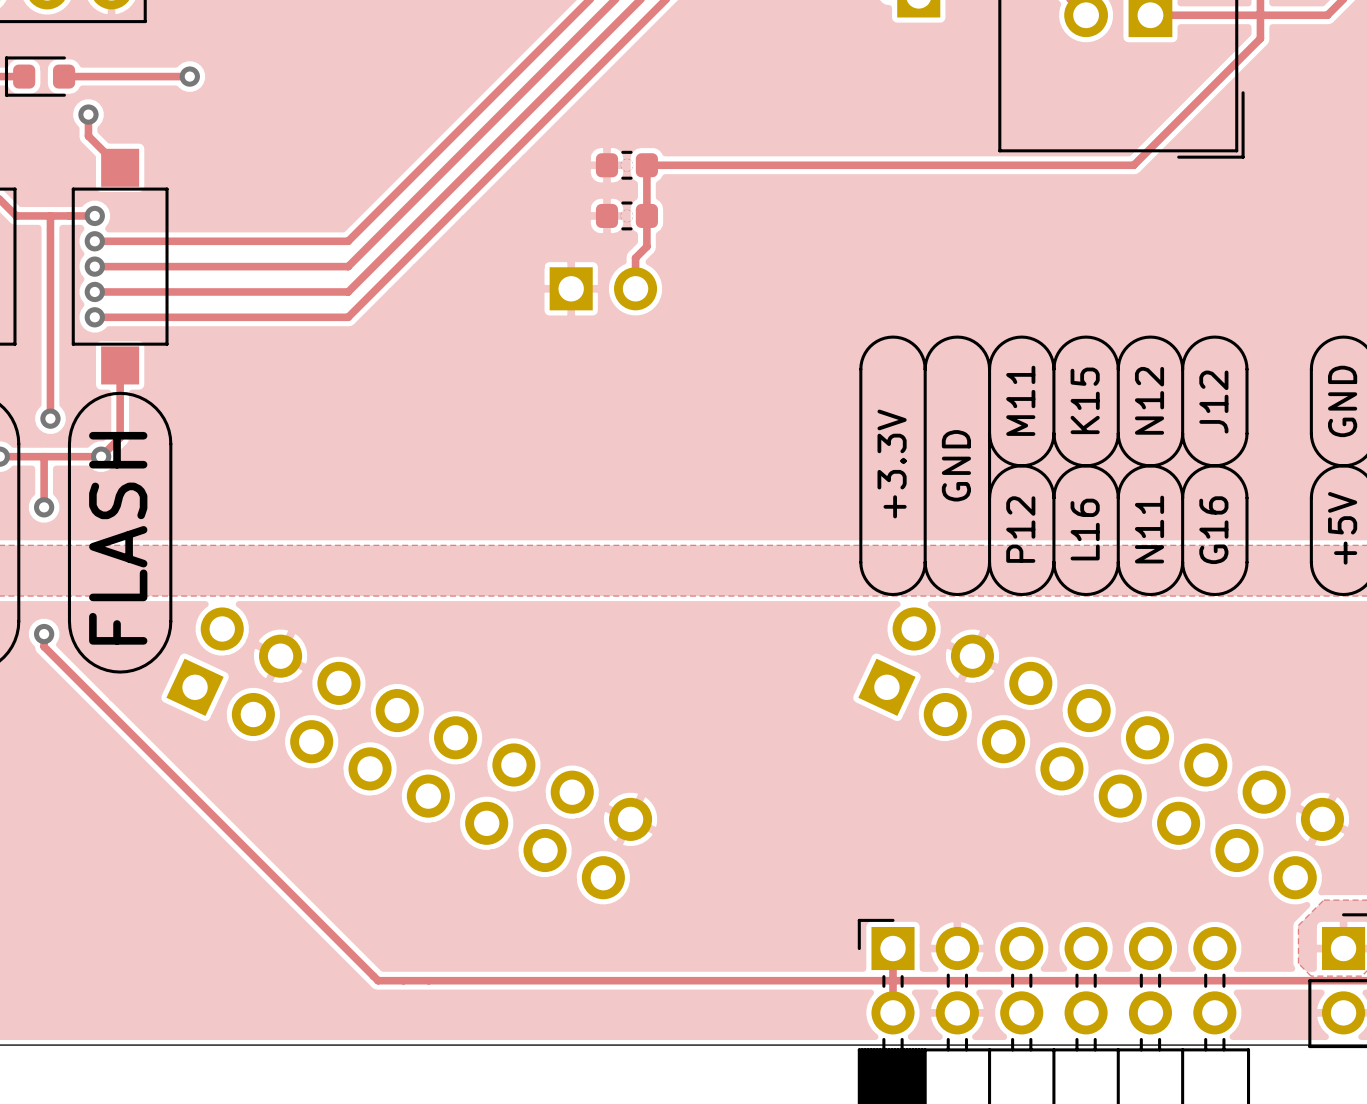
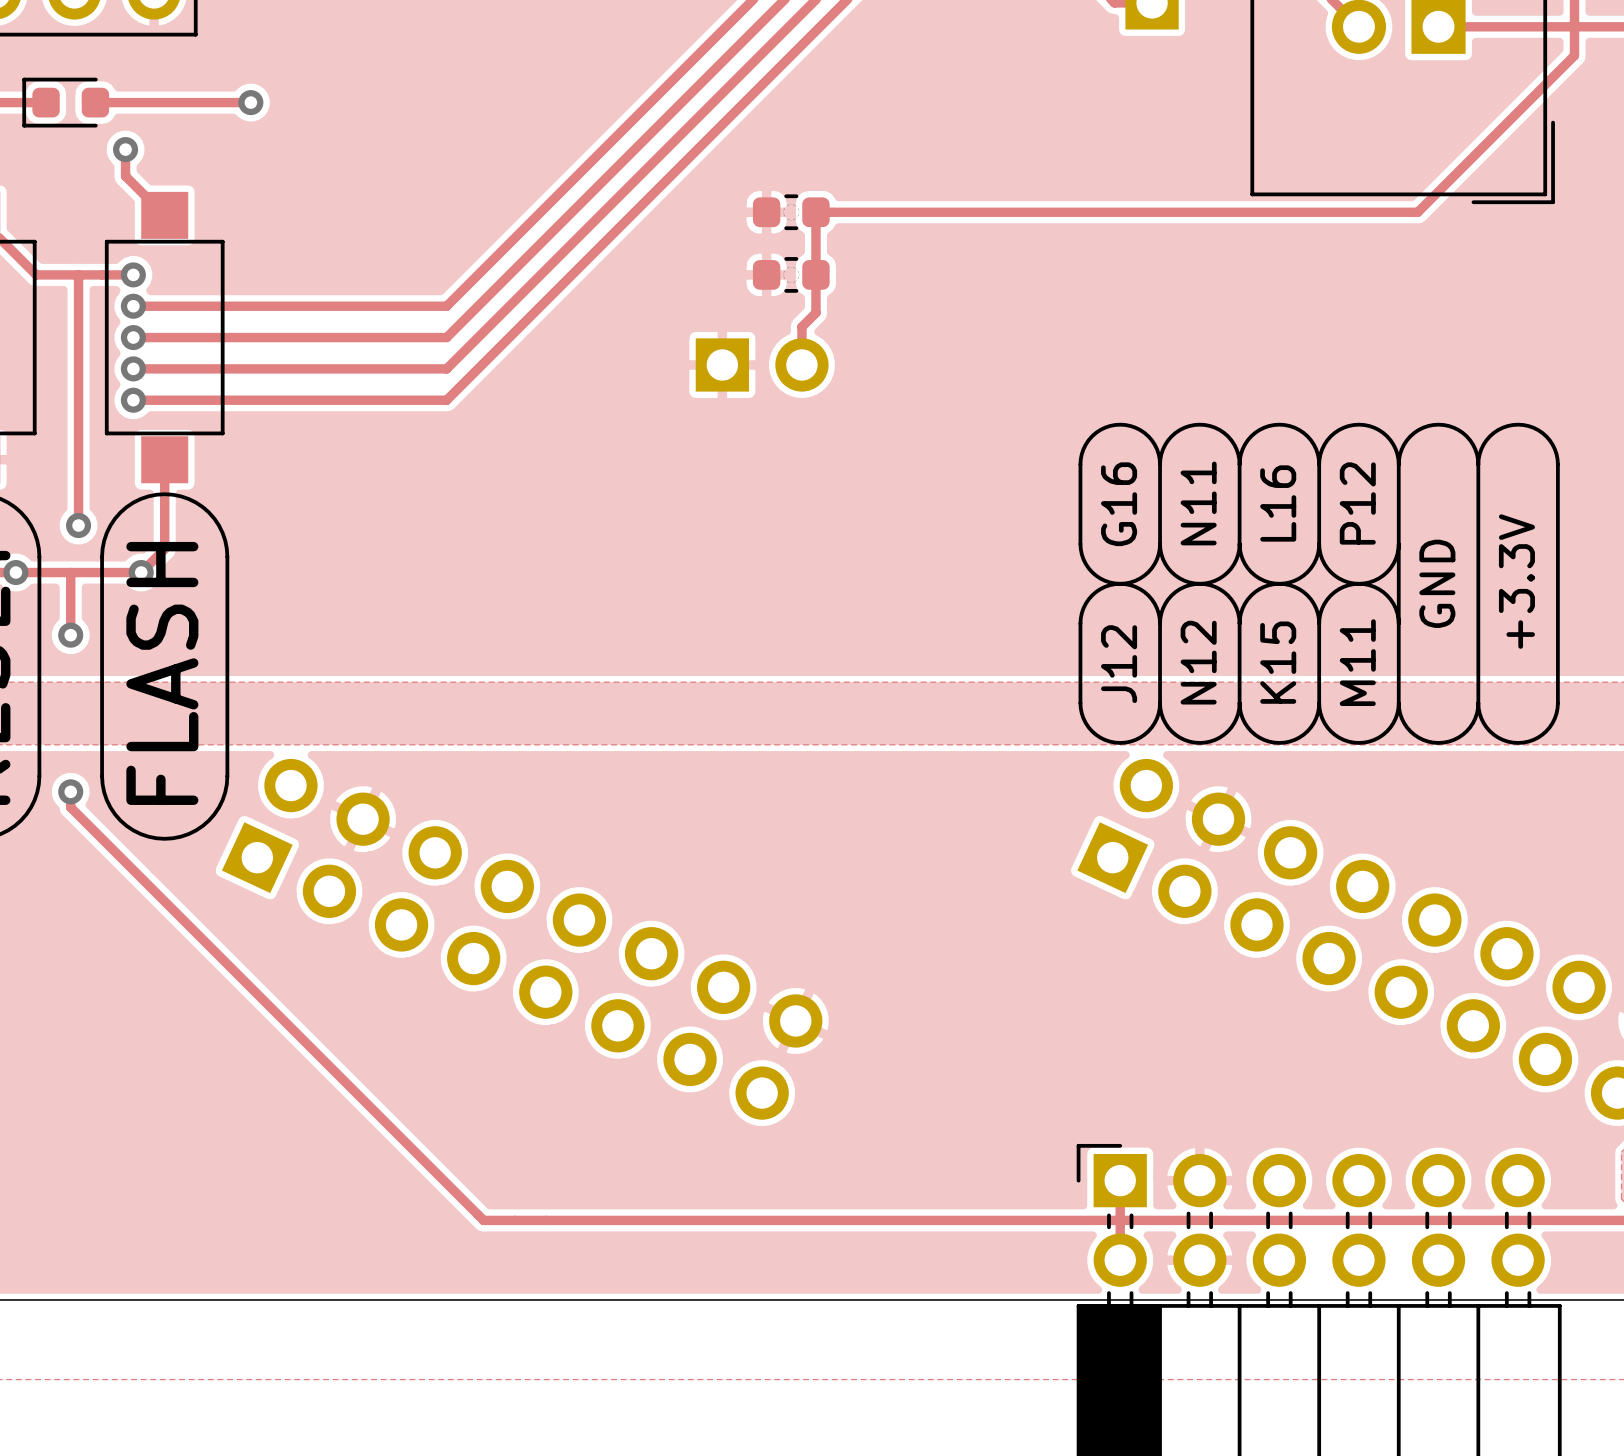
text: M11 (1020, 400) -> L16 (1278, 503)
text: K15 (1085, 400) -> P12 (1357, 503)
text position: N12 (1149, 400) -> N12 (1198, 662)
text position: J12 (1213, 402) -> J12 (1119, 664)
line: (860, 433) (860, 497) -> (1080, 544) (1083, 559) (1092, 572) (1105, 580) (1120, 583) (1135, 580) (1148, 572) (1157, 559) (1160, 544) (1163, 559) (1175, 575) (1194, 583) (1210, 582) (1219, 578) (1231, 568) (1238, 554) (1239, 544)
line: (925, 433) (925, 497) -> (1478, 544) (1478, 623)
line: (989, 433) (989, 497) -> (1080, 623) (1083, 608) (1092, 595) (1105, 586) (1120, 583) (1135, 586) (1148, 595) (1157, 608) (1160, 623) (1163, 608) (1175, 592) (1194, 584) (1210, 585) (1219, 589) (1231, 599) (1236, 608) (1239, 623)
line: (1118, 433) (1120, 445) (1127, 456) (1138, 463) (1150, 465) (1162, 463) (1173, 456) (1180, 445) (1182, 433) (1185, 445) (1195, 459) (1210, 465) (1223, 464) (1230, 461) (1240, 453) (1245, 441) (1247, 433) -> (1398, 544) (1398, 623)
text position: +3.3V (892, 463) -> +3.3V (1516, 581)
text position: GND (956, 465) -> GND (1437, 583)
line: (1118, 497) (1120, 485) (1127, 475) (1138, 468) (1150, 465) (1162, 468) (1173, 475) (1180, 485) (1182, 497) (1185, 485) (1195, 472) (1210, 466) (1223, 466) (1230, 470) (1240, 478) (1244, 485) (1247, 497) -> (1557, 544) (1557, 623)
text: P12 (1020, 529) -> K15 (1278, 662)
text: L16 (1085, 529) -> M11 (1357, 662)
text position: N11 (1149, 529) -> N11 (1198, 503)
text position: G16 (1213, 530) -> G16 (1119, 504)

